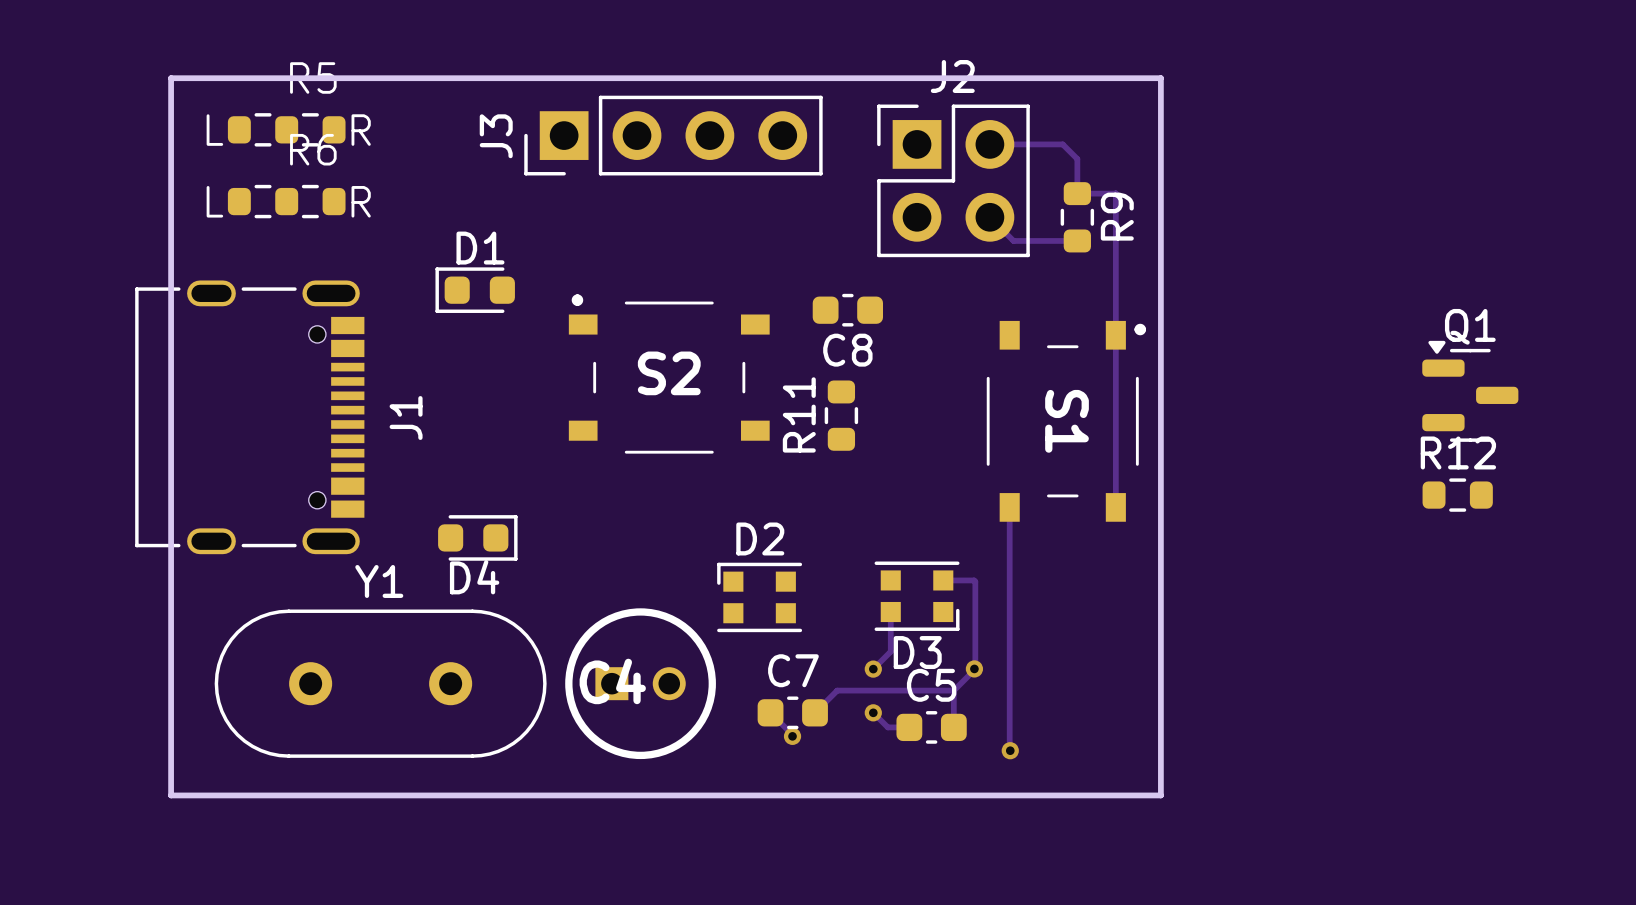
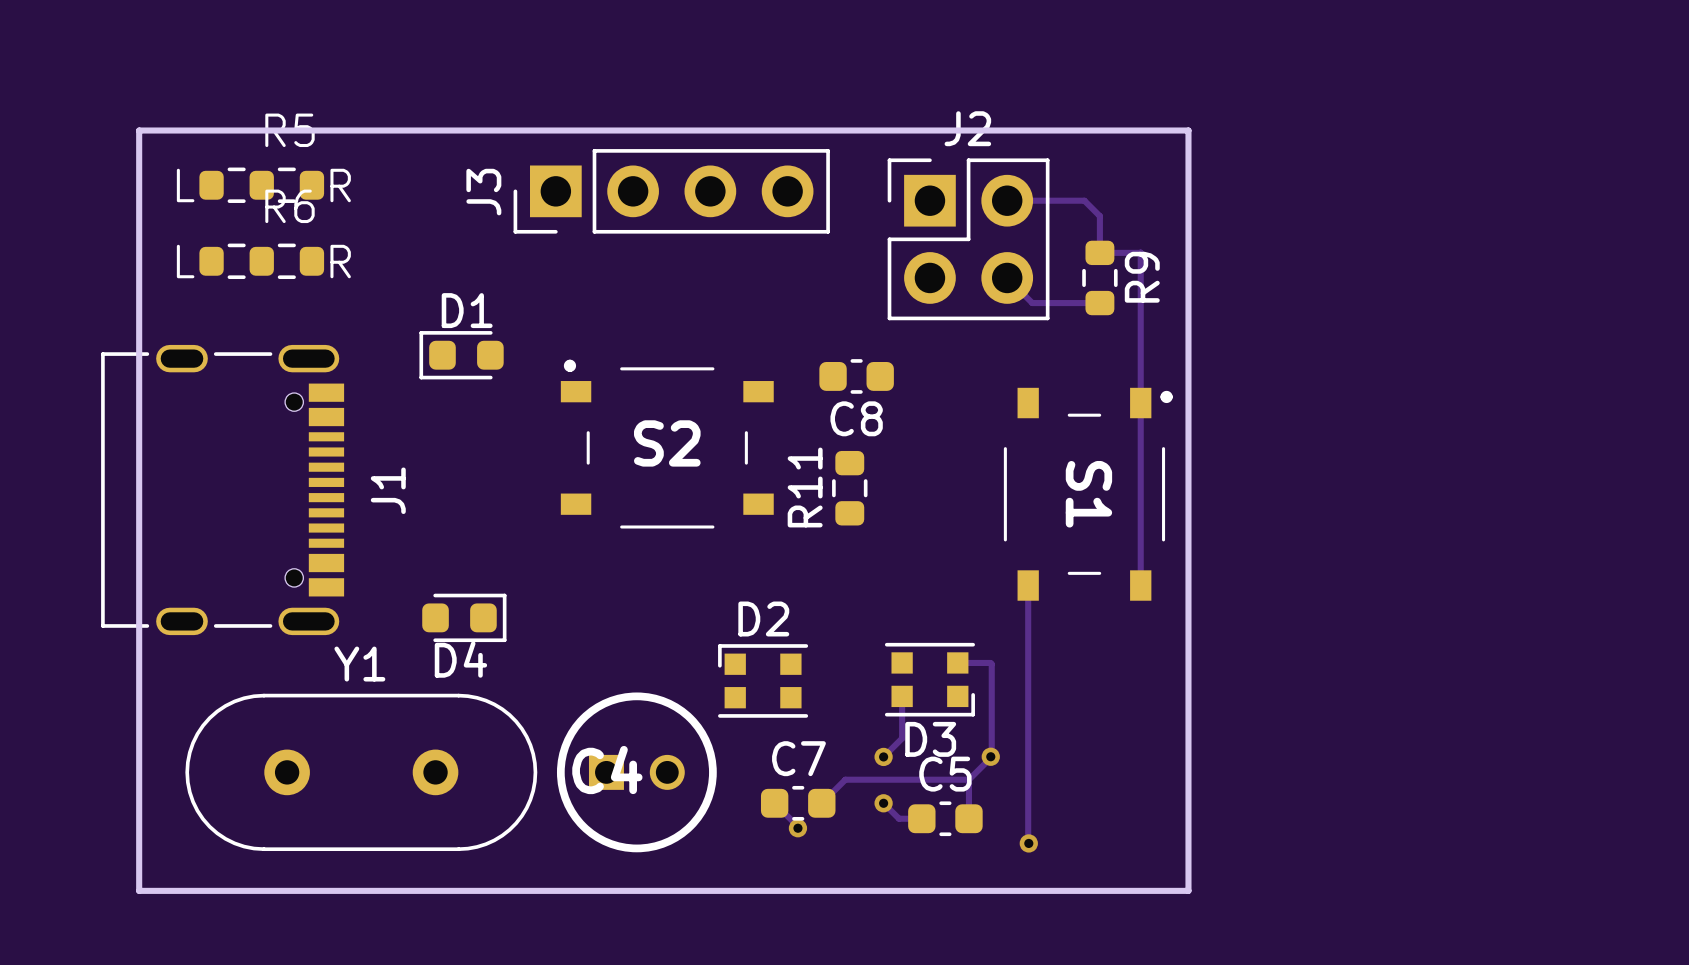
Q1: (1470, 391) -> none
R12: (1457, 495) -> none

